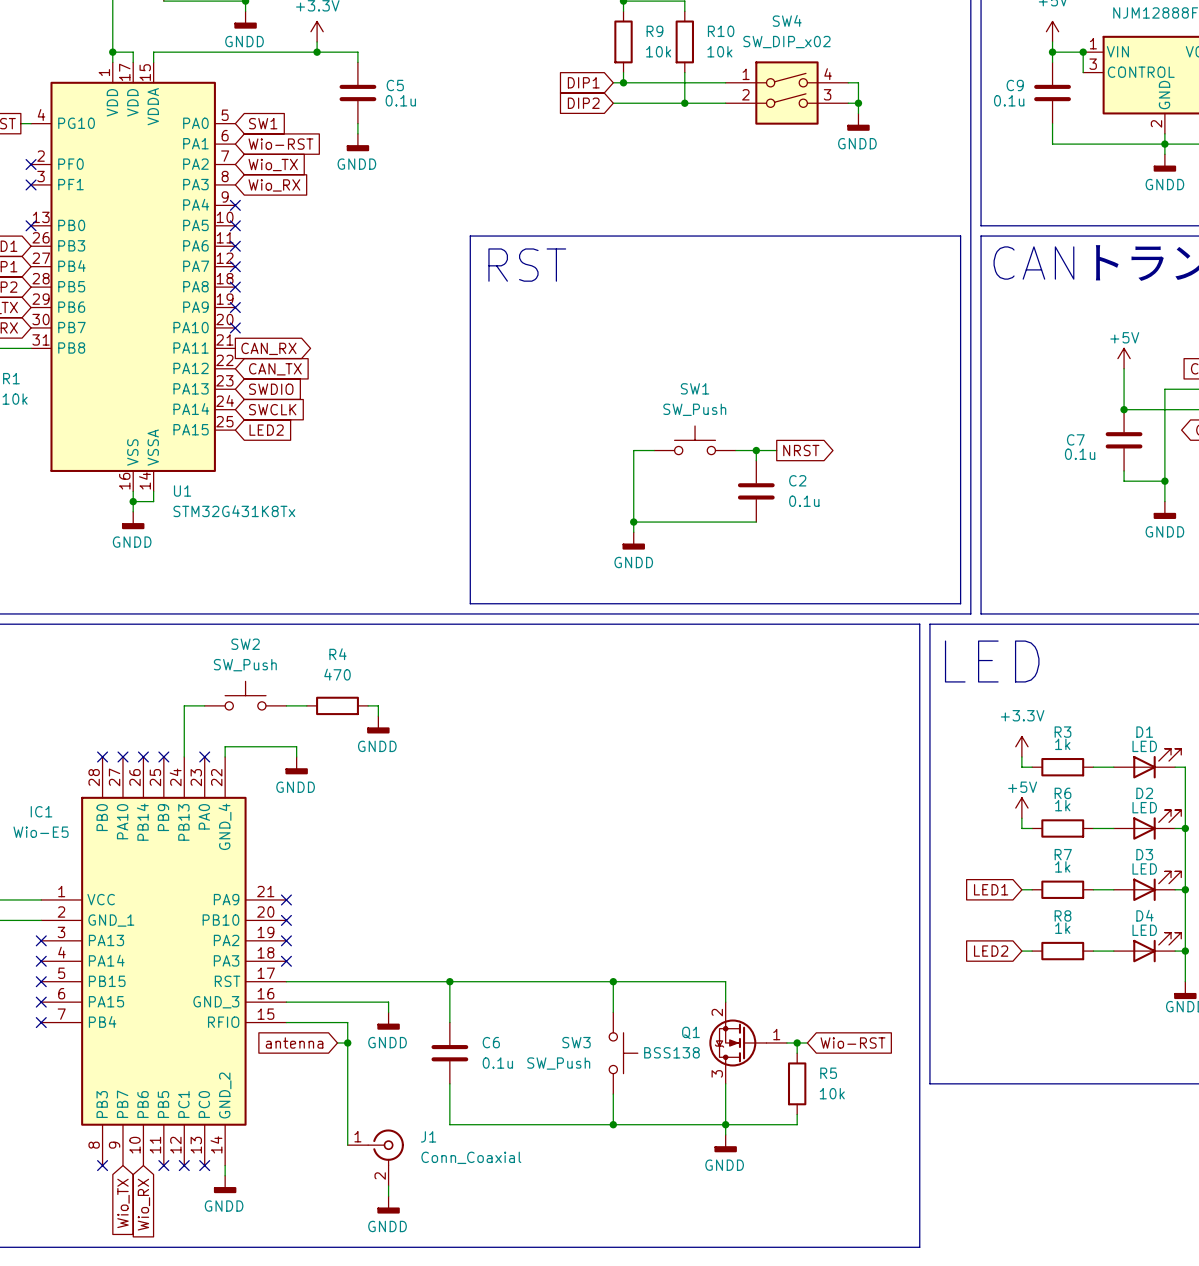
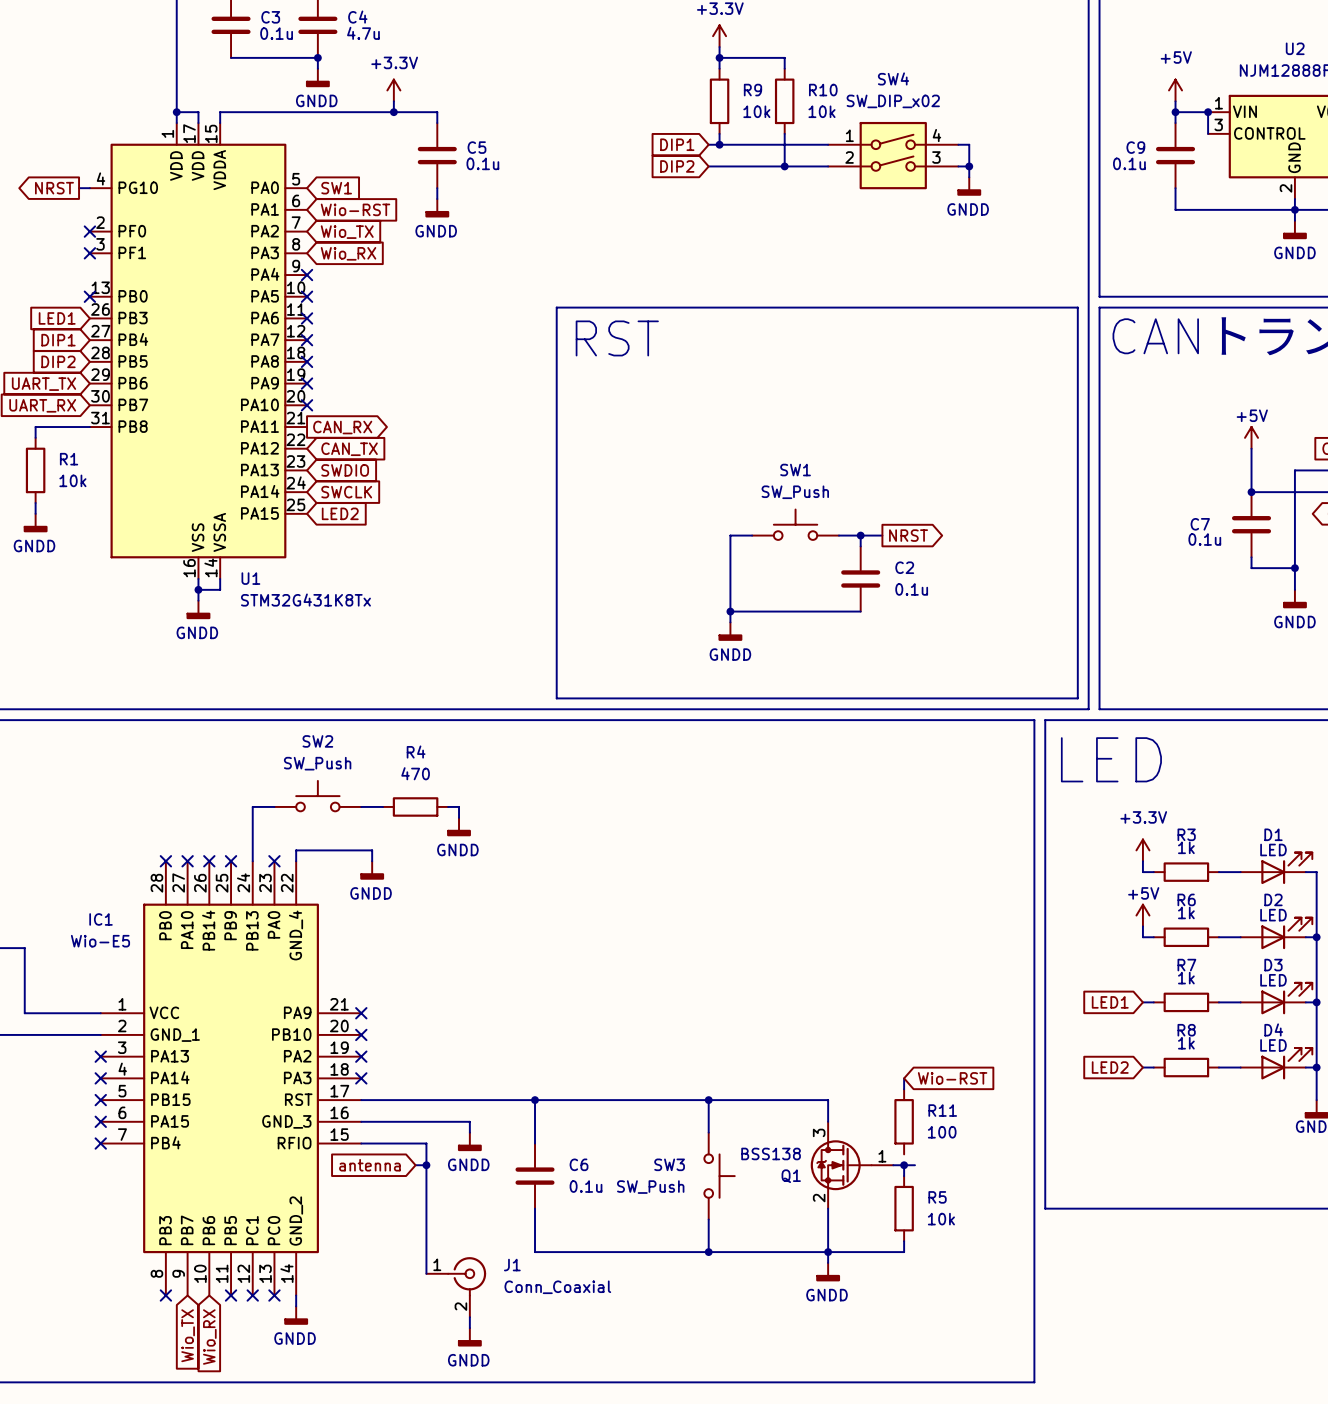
wire: none -> (904, 1078) (904, 1089)
R11: none -> 100 (904, 1121)
Q1 flip: as is (737, 1042) -> up-down (841, 1165)
global label position: Wio-RST (853, 1042) -> Wio-RST (952, 1078)

